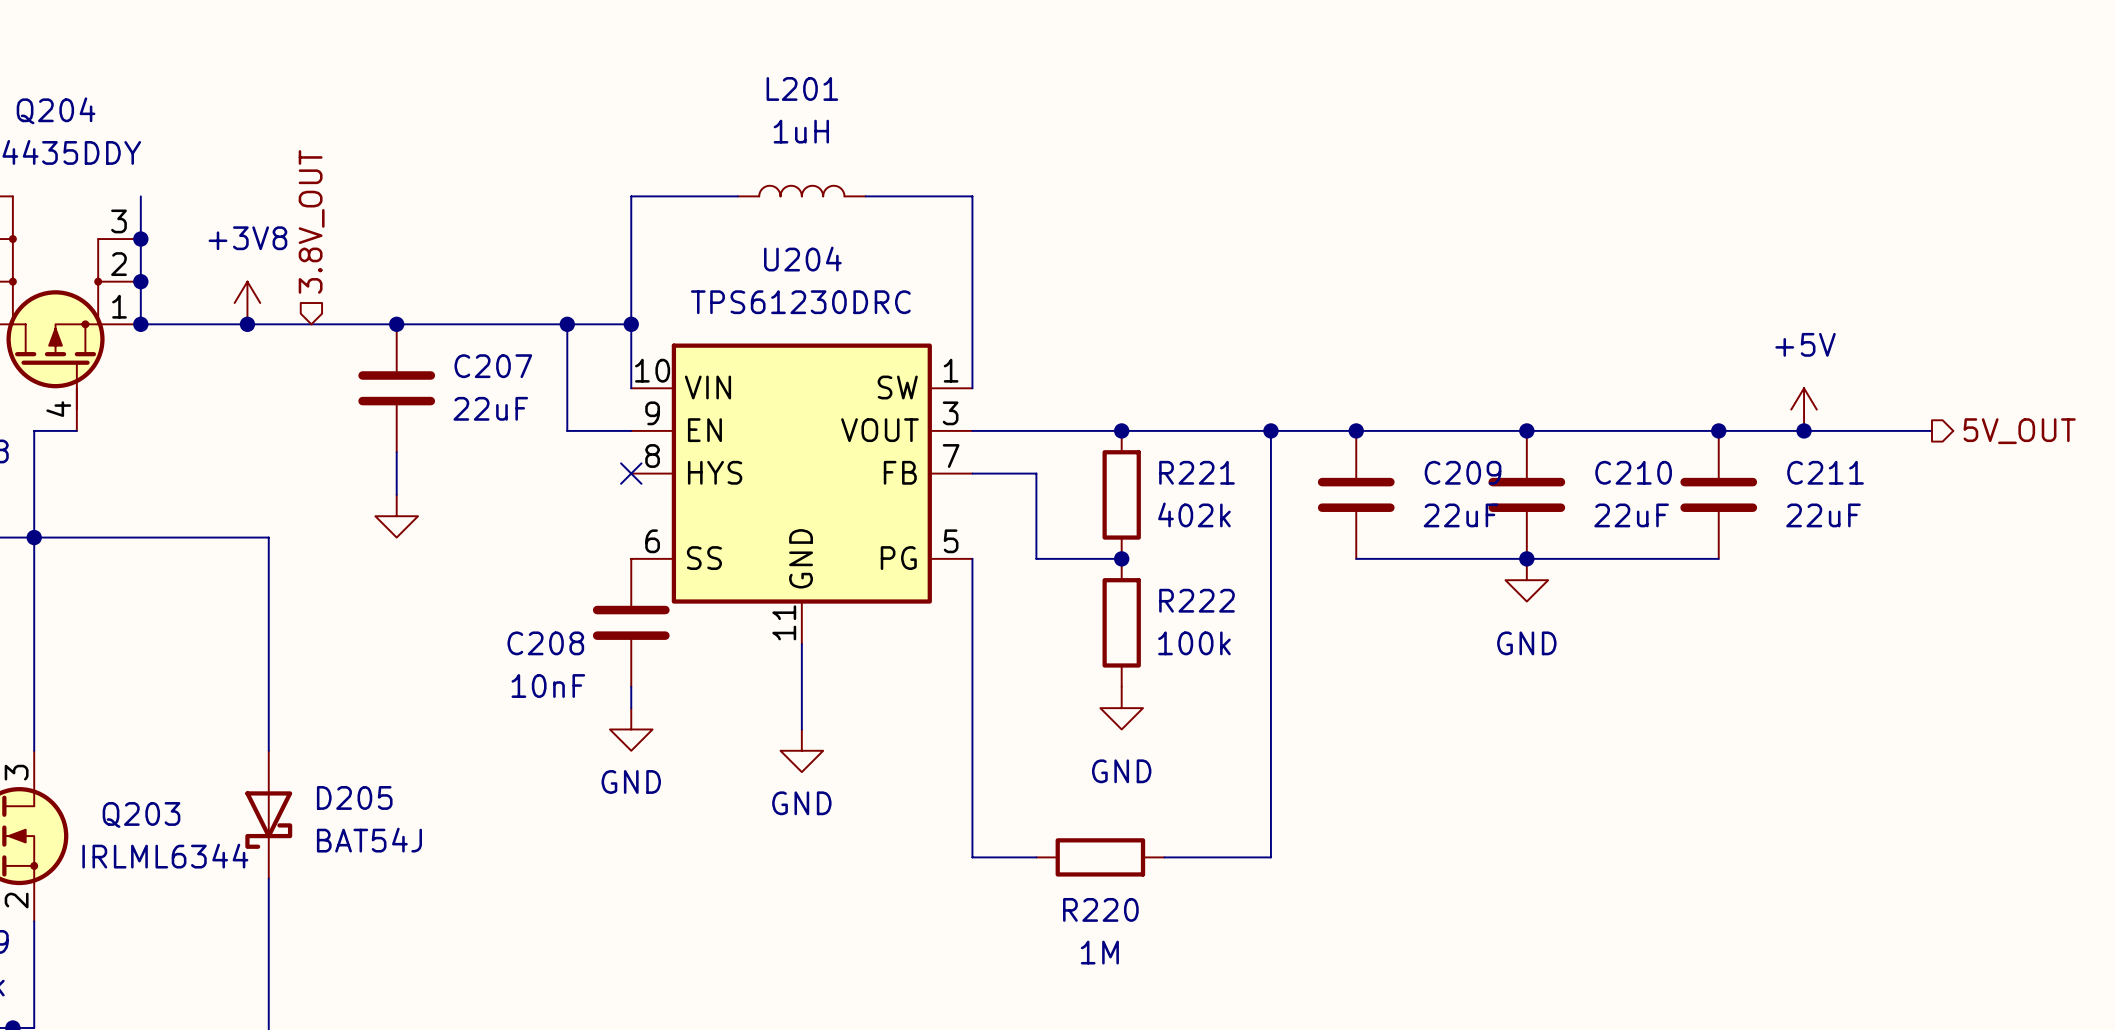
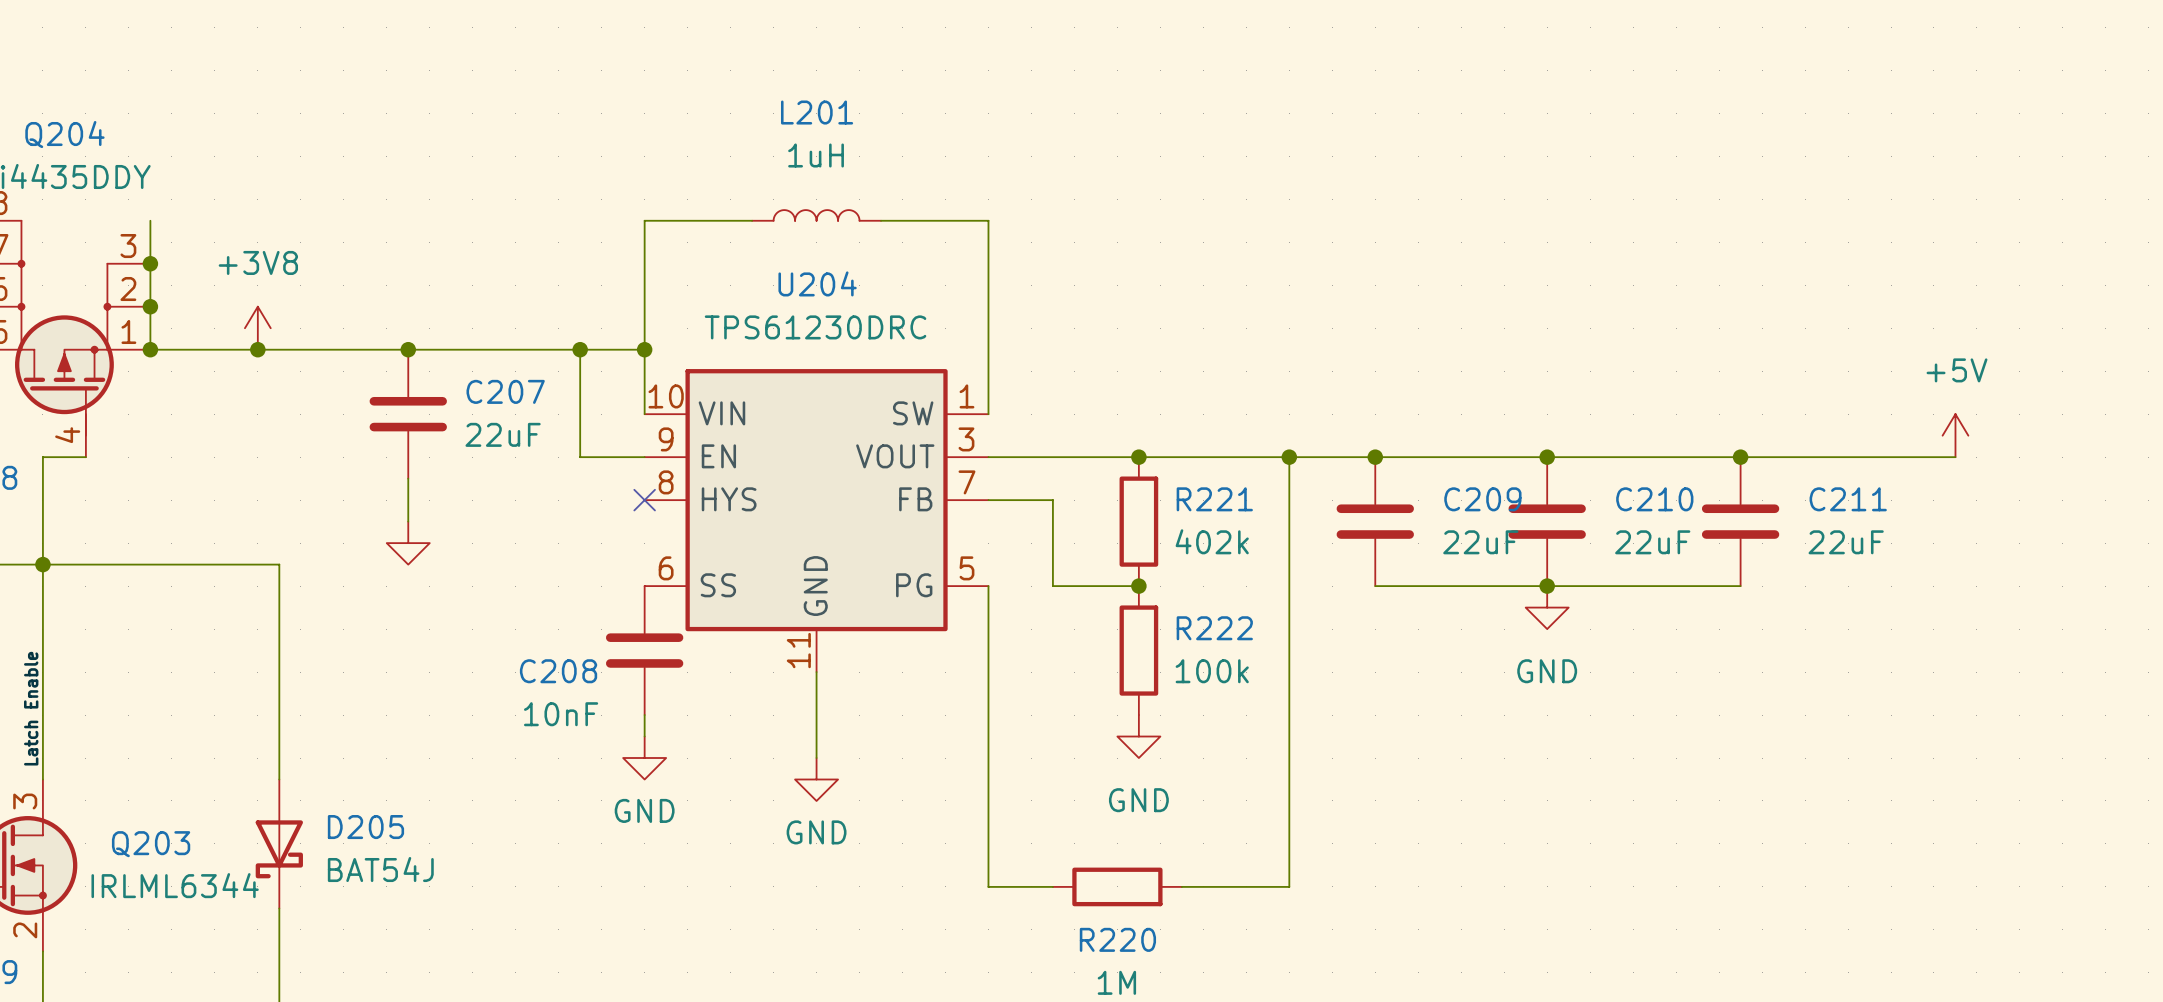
hierarchical label: 3.8V_OUT (311, 221) -> none
power symbol position: +5V (1804, 409) -> +5V (1955, 435)
junction: (1804, 430) -> none
hierarchical label: 5V_OUT (2019, 431) -> none
label: none -> Latch Enable (31, 708)

